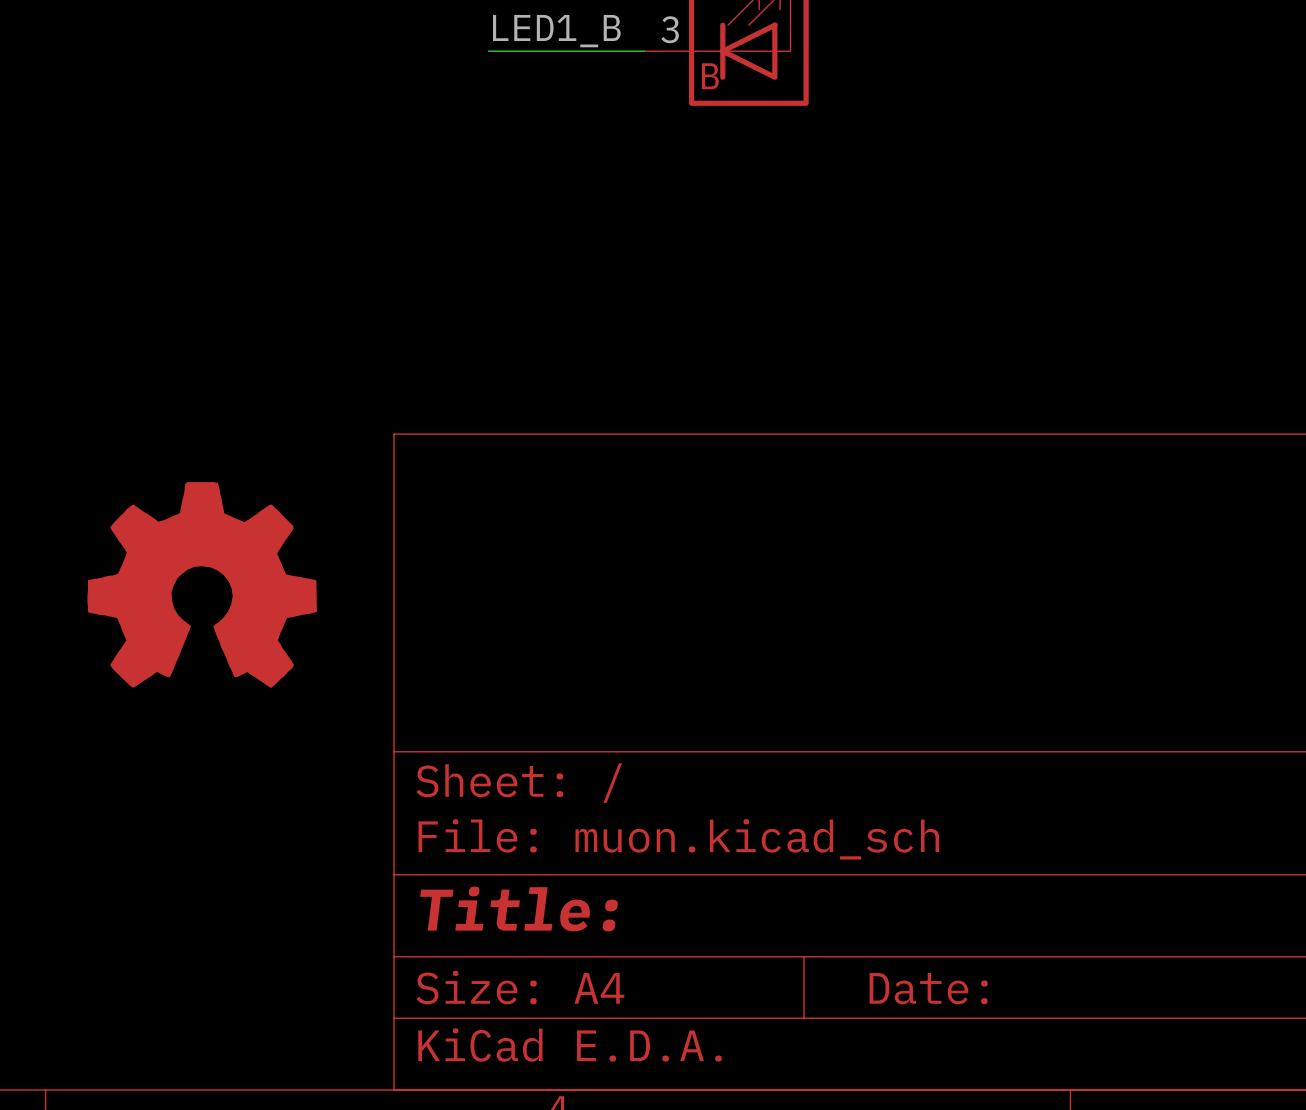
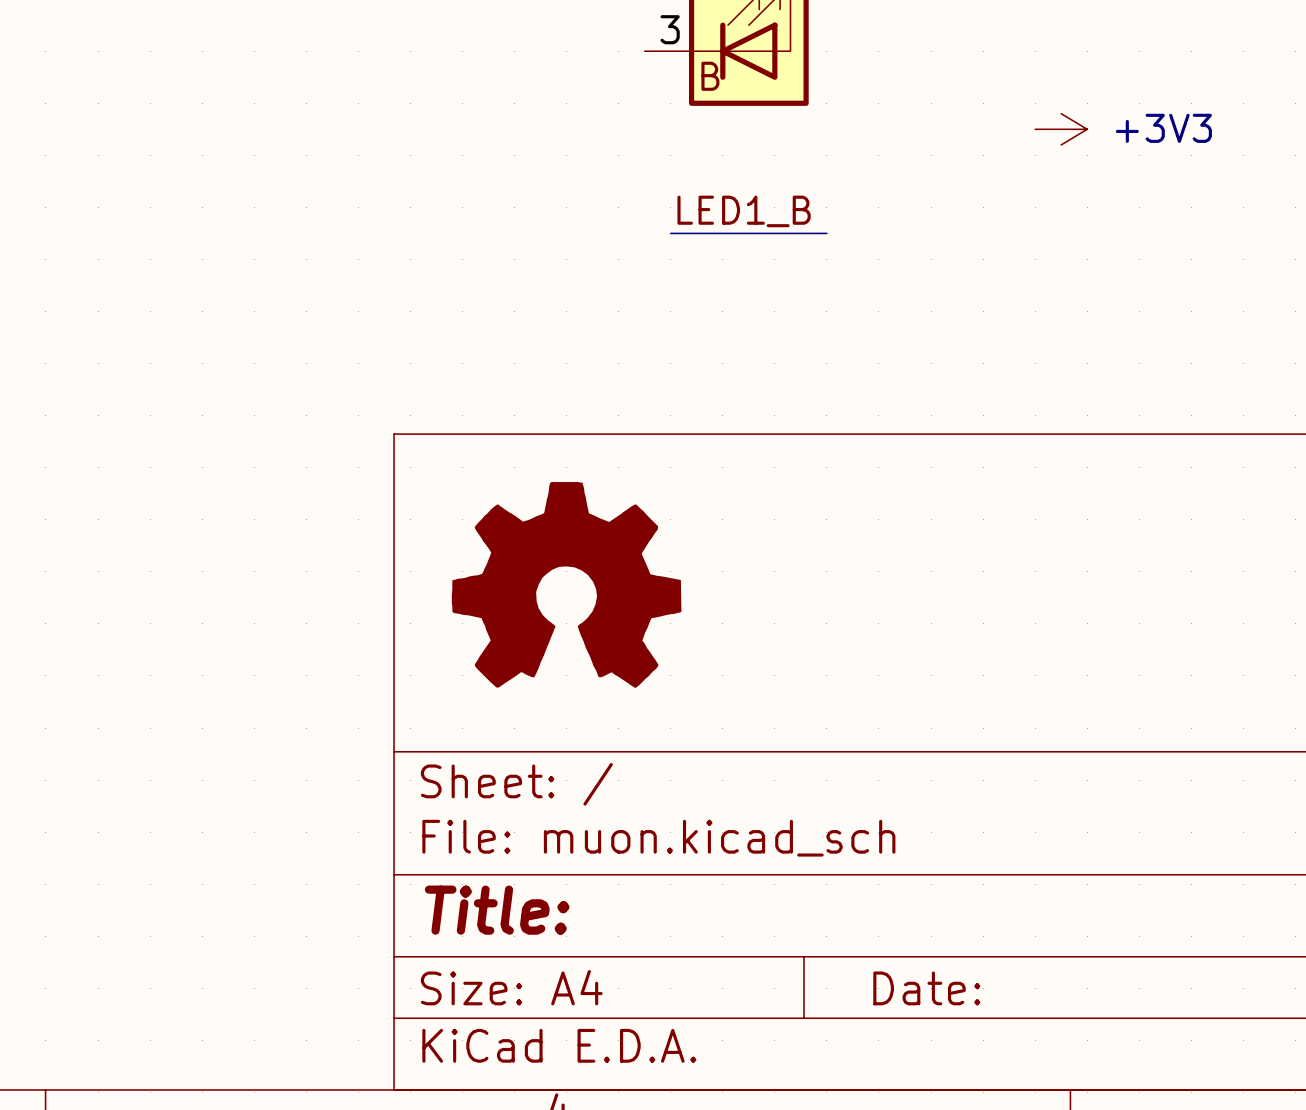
label position: LED1_B (556, 31) -> LED1_B (744, 211)
wire: (488, 51) (644, 51) -> (670, 233) (826, 233)
power symbol: none -> +3V3 (1061, 129)
power symbol position: (202, 584) -> (566, 584)

